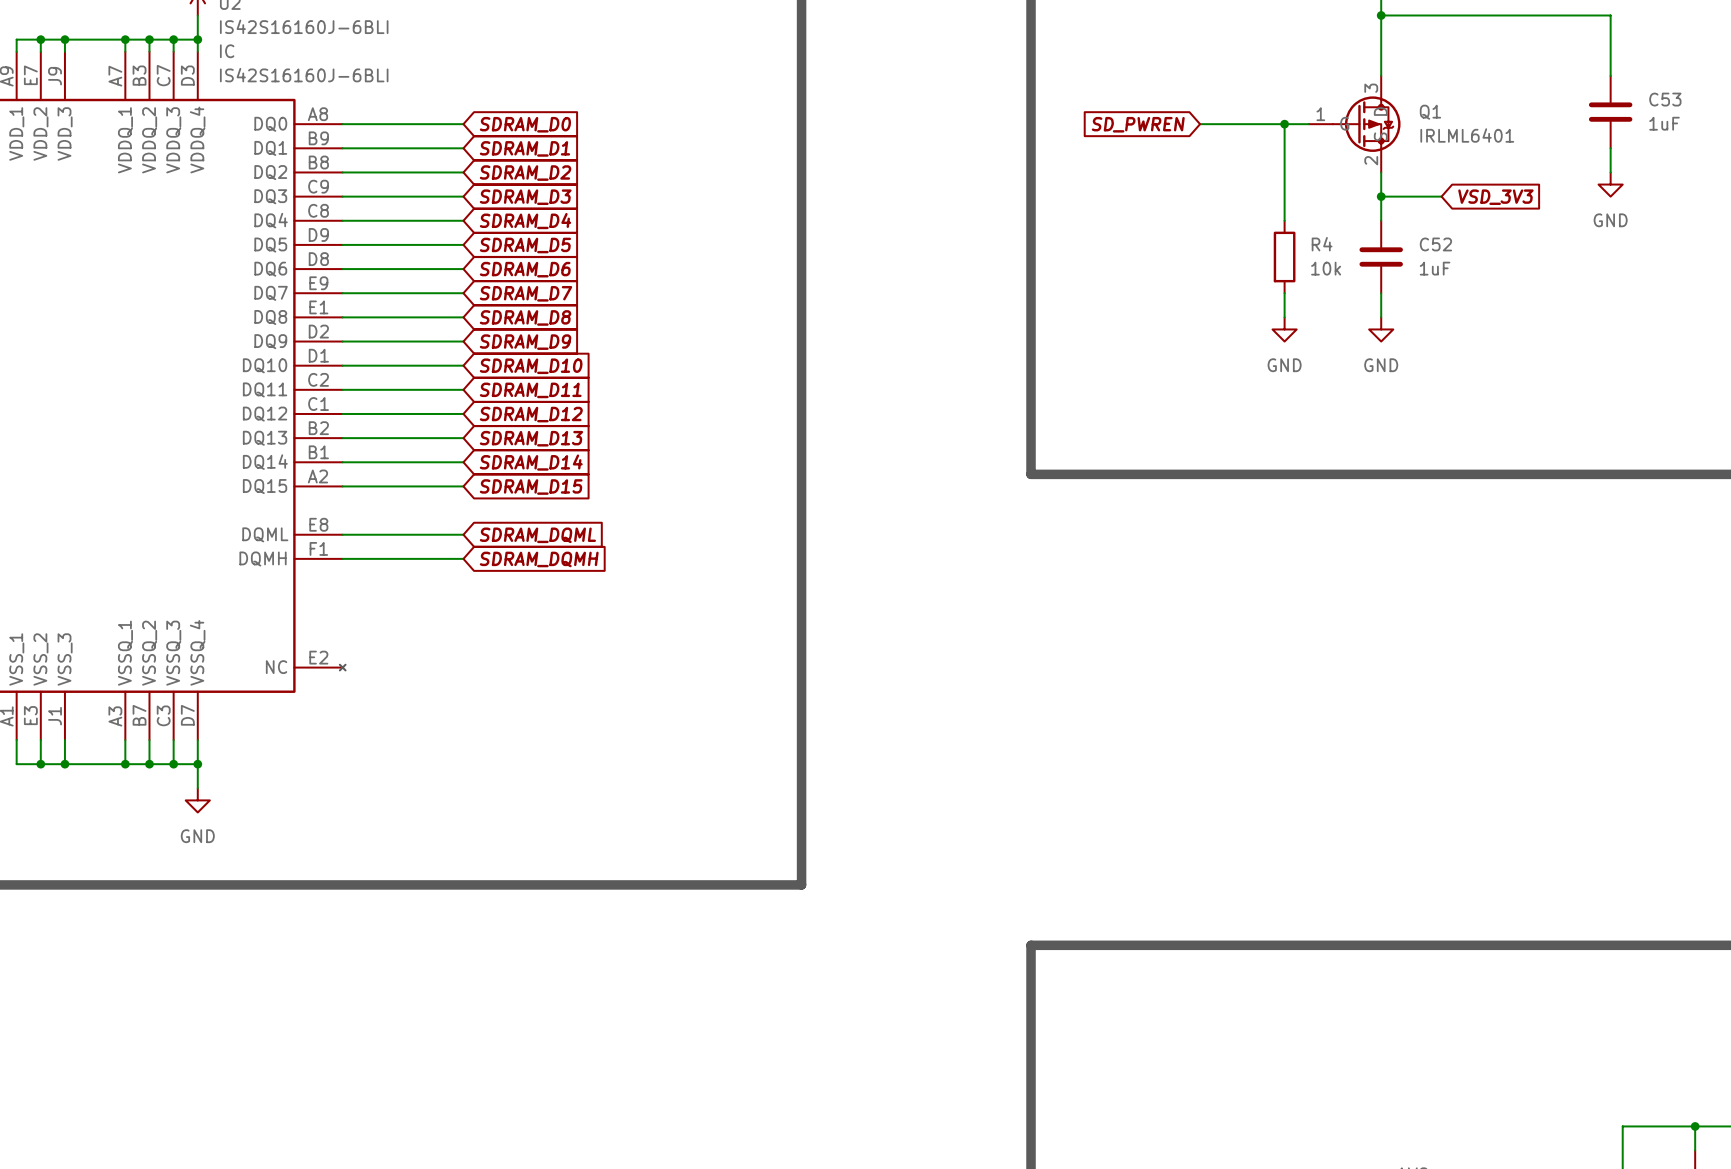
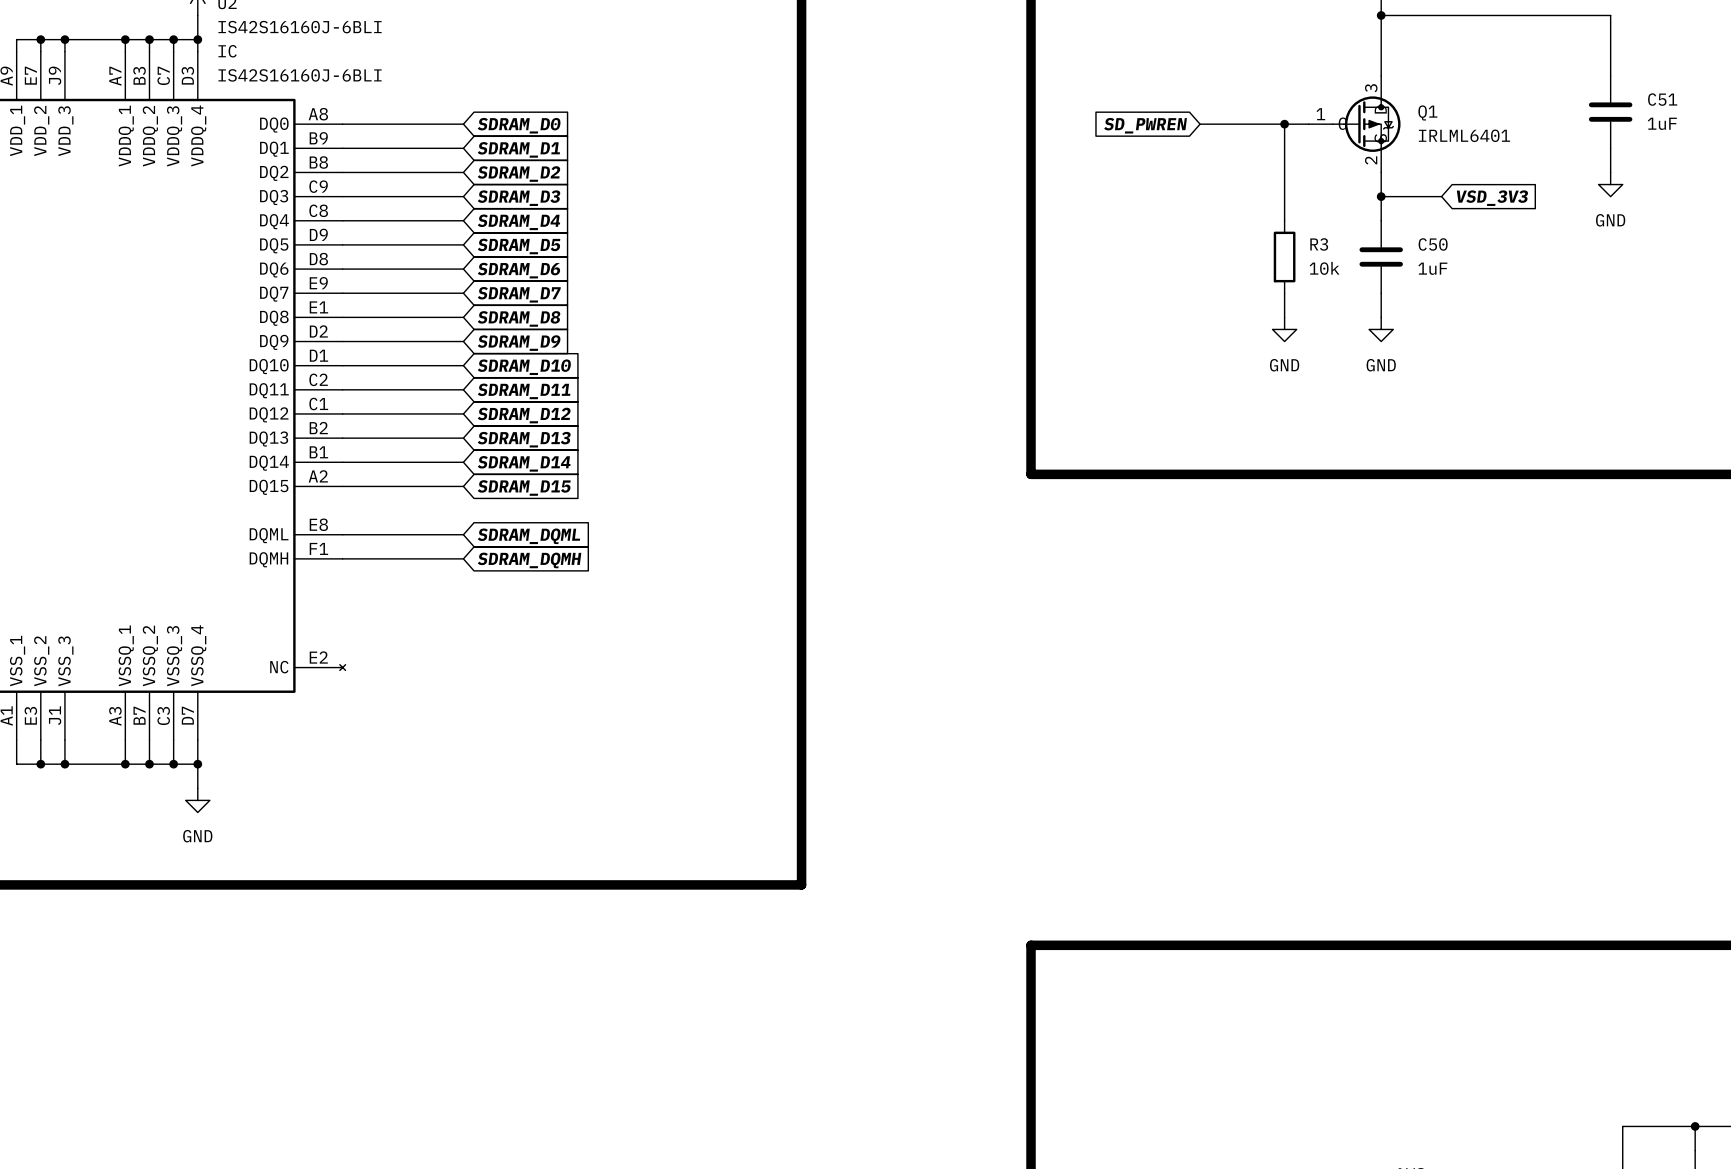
C53 name: C53 (1665, 99) -> C51 (1662, 99)
R4 name: R4 (1322, 244) -> R3 (1319, 244)
C52 name: C52 (1435, 244) -> C50 (1433, 244)

